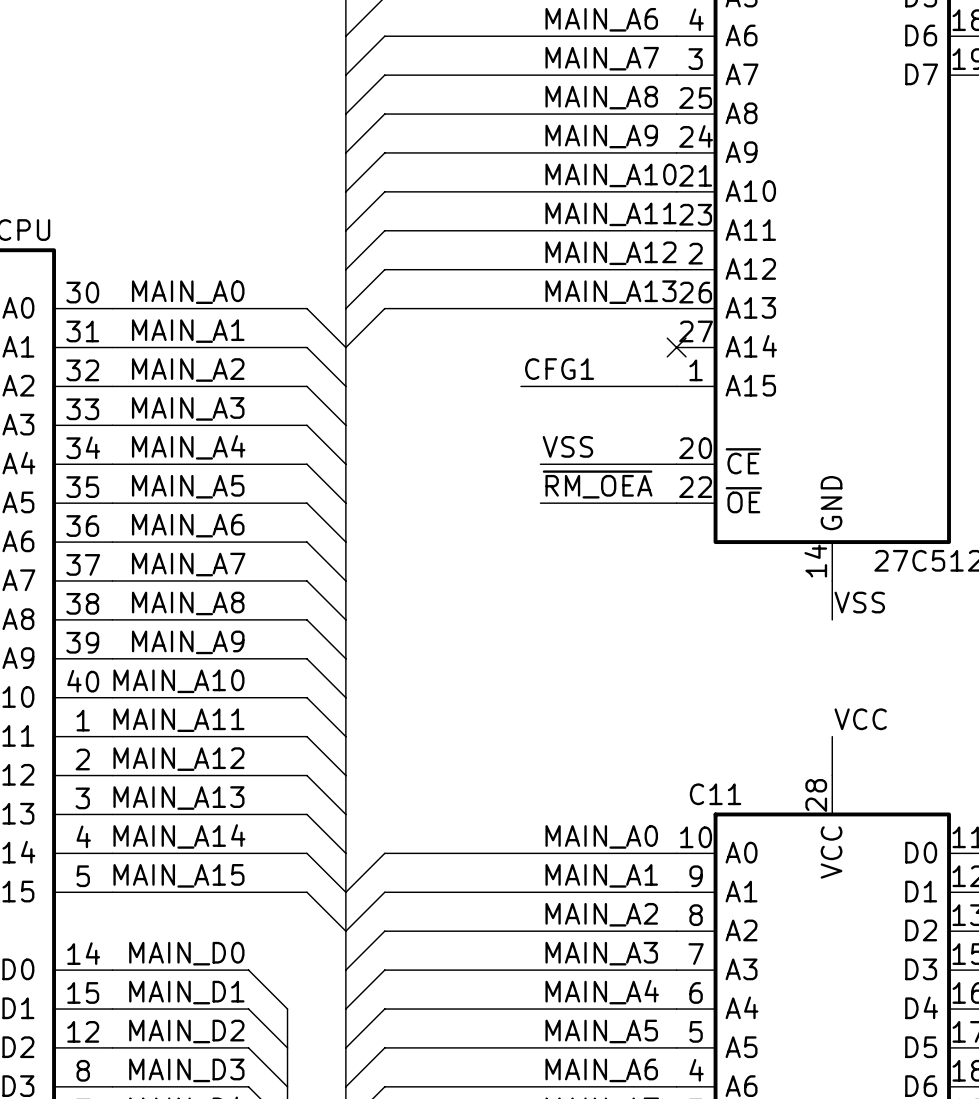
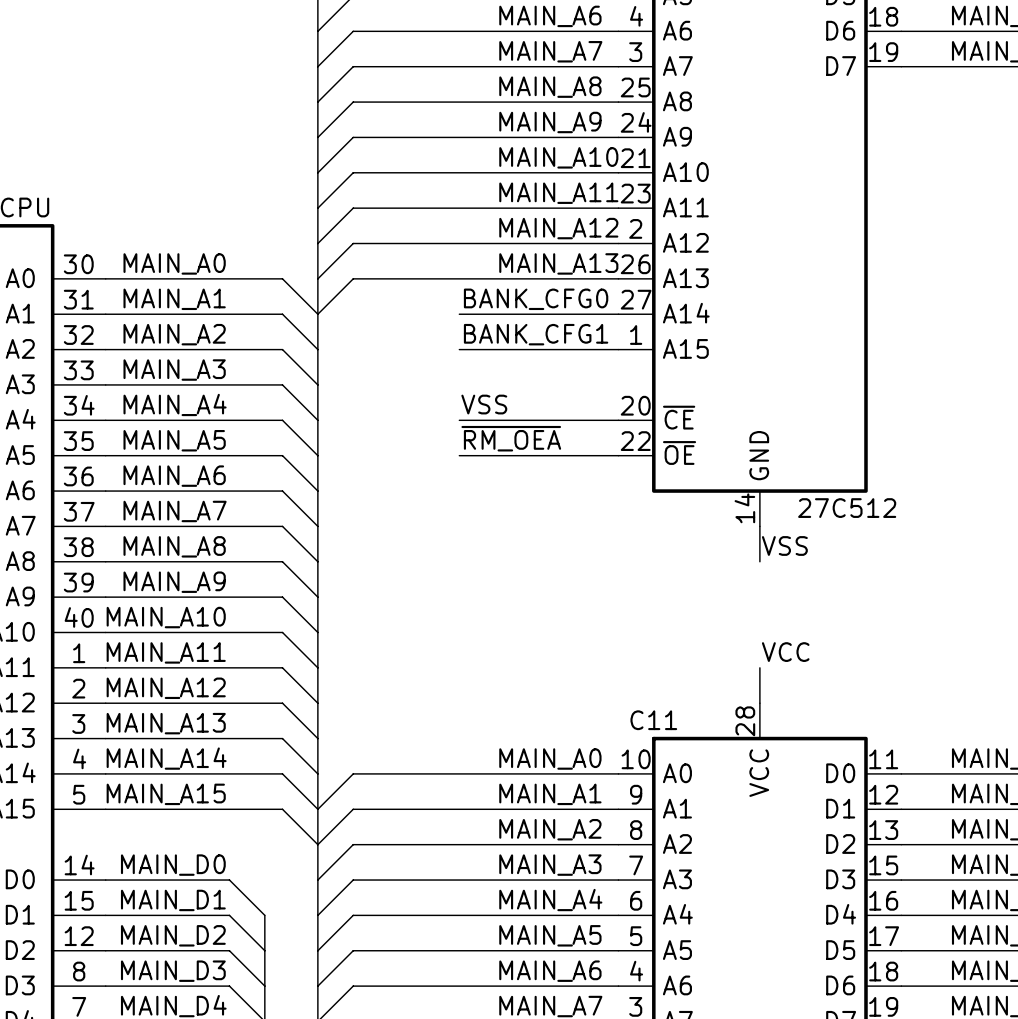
label: none -> BANK_CFG0 (536, 299)
wire: none -> (459, 314) (618, 314)
no-connect mark: (676, 347) -> none
label: CFG1 (559, 369) -> BANK_CFG1 (536, 334)
wire: none -> (459, 349) (477, 349)
label position: VSS (567, 446) -> VSS (484, 404)
wire: none -> (459, 420) (494, 420)
label position: ~{RM_OEA} (597, 484) -> ~{RM_OEA} (511, 438)
wire: none -> (459, 455) (494, 455)

